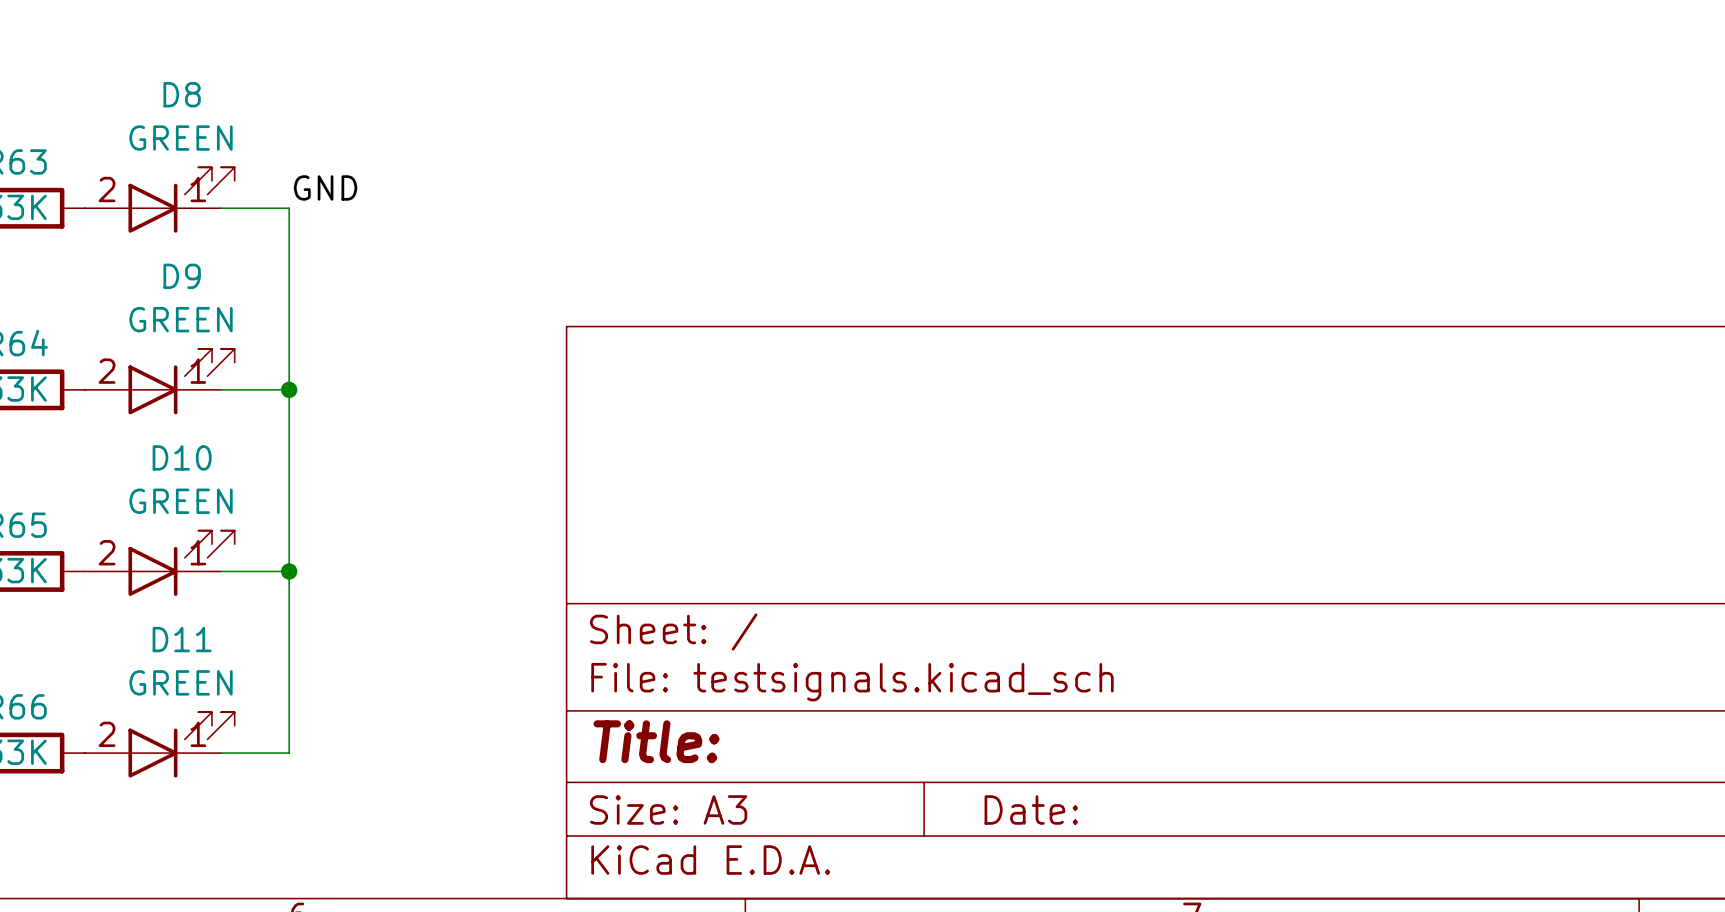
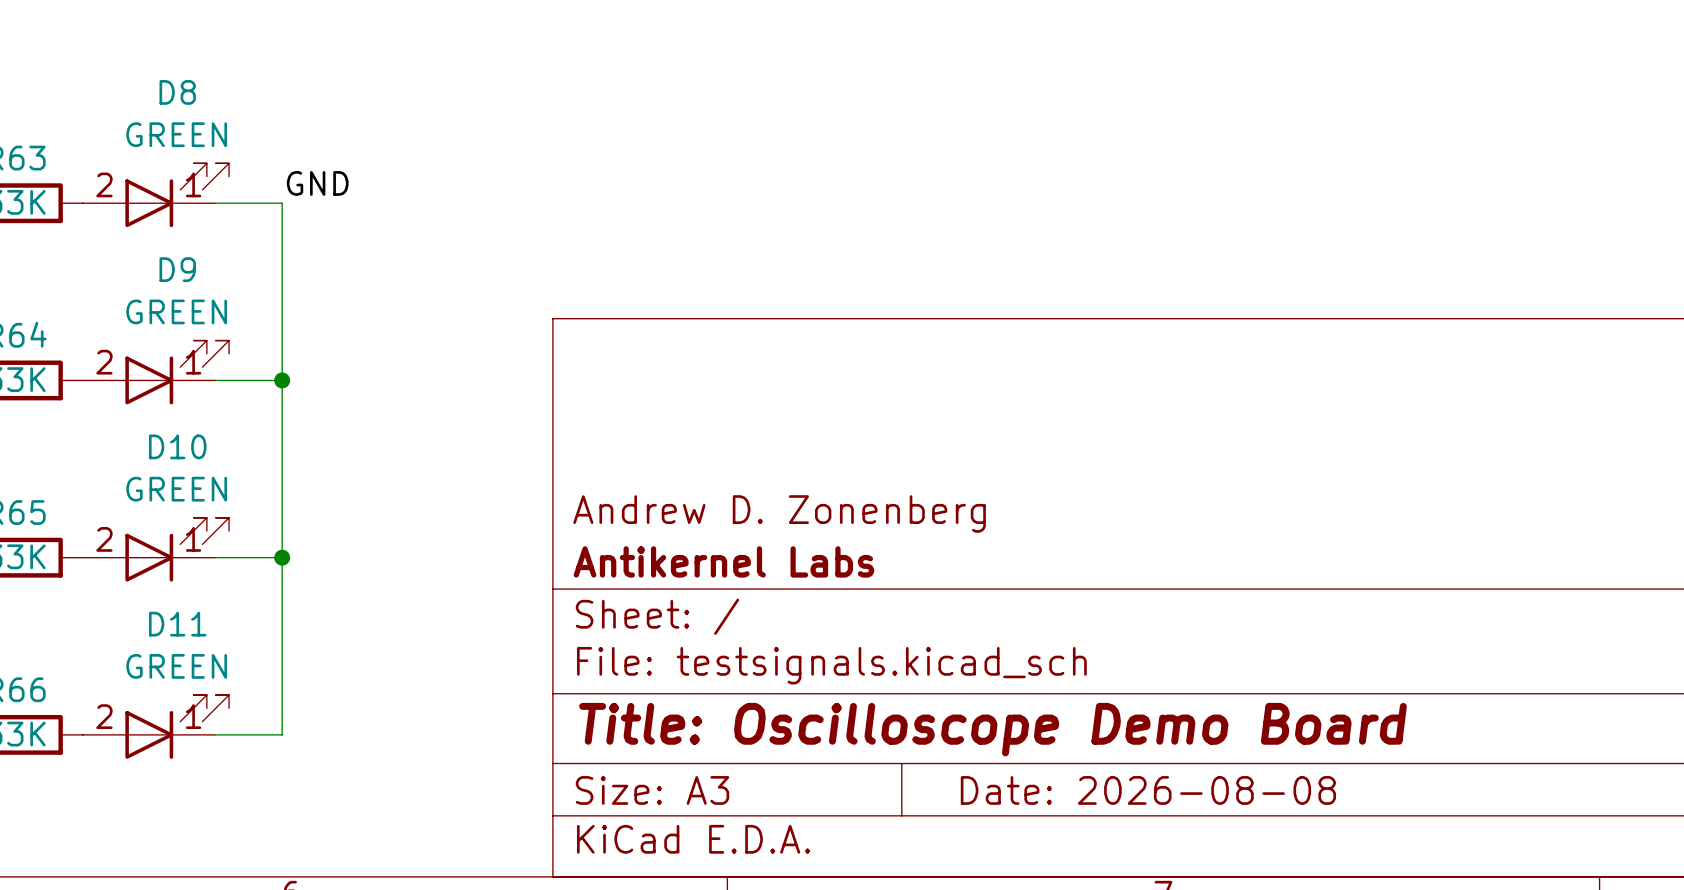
title block: none -> Andrew D. Zonenberg (779, 513)
title block: none -> Antikernel Labs (723, 561)
title block: Title: (656, 741) -> Title: Oscilloscope Demo Board (993, 729)
title block: Date: (1031, 809) -> Date: 2026-08-08 (1148, 790)

